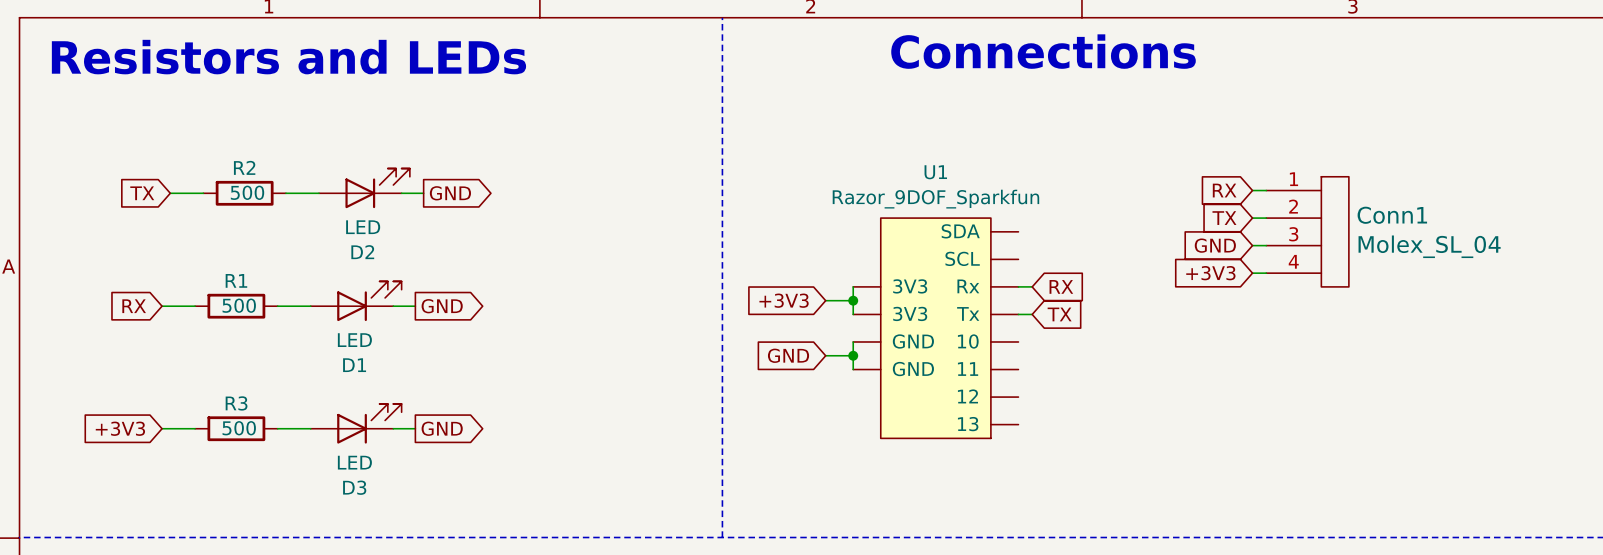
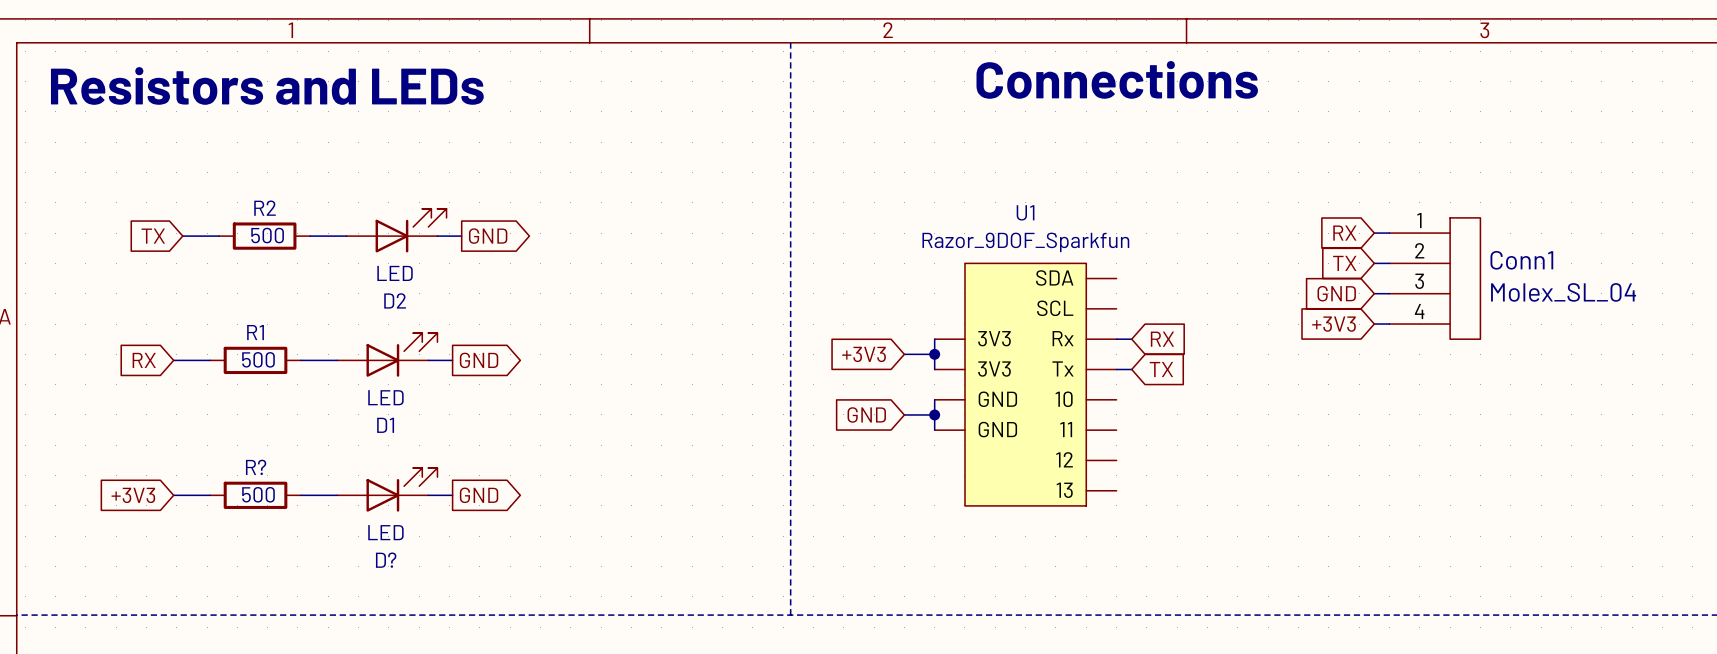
R3 name: R3 (236, 403) -> R? (256, 467)
D3 name: D3 (354, 487) -> D? (386, 560)

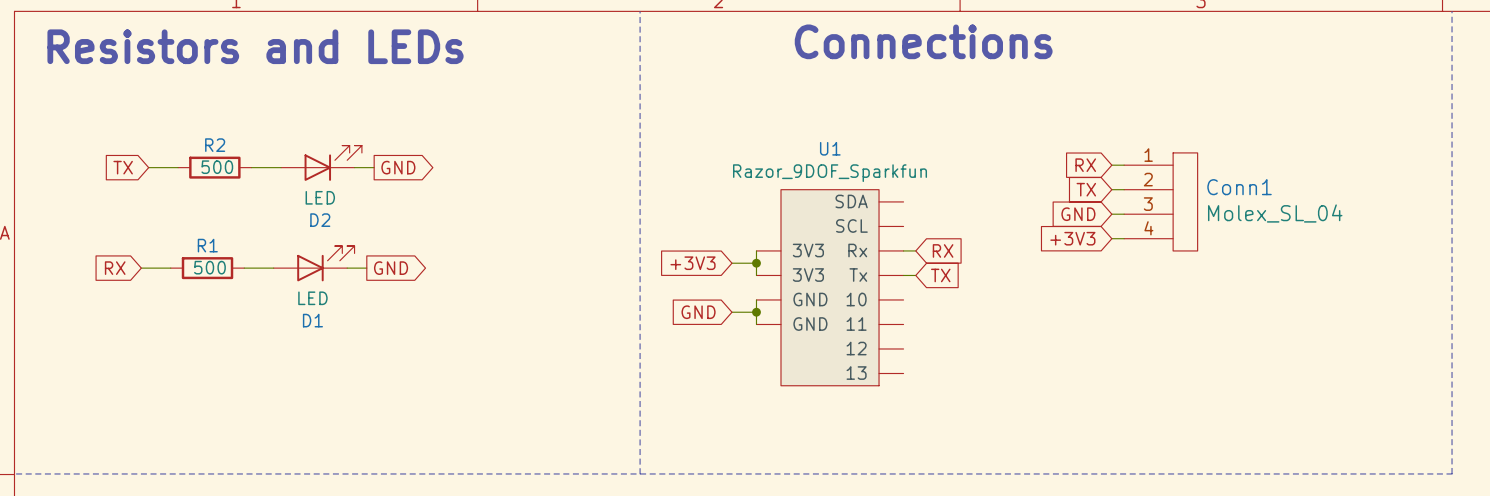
D?: LED (387, 489) -> none
global label: +3V3 (133, 495) -> none
wire: (173, 495) (210, 495) -> none
R?: 500 (255, 495) -> none
wire: (301, 495) (337, 495) -> none
wire: (428, 495) (452, 495) -> none
global label: GND (479, 495) -> none

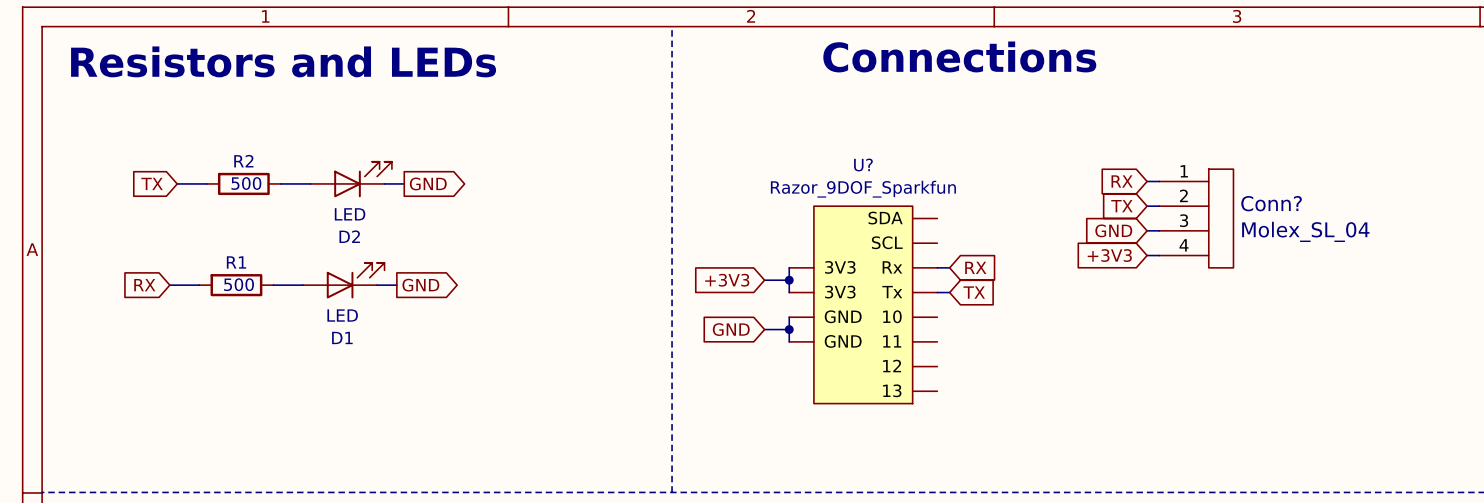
U1 name: U1 (830, 148) -> U? (863, 165)
Conn1 name: Conn1 (1239, 187) -> Conn? (1271, 203)

